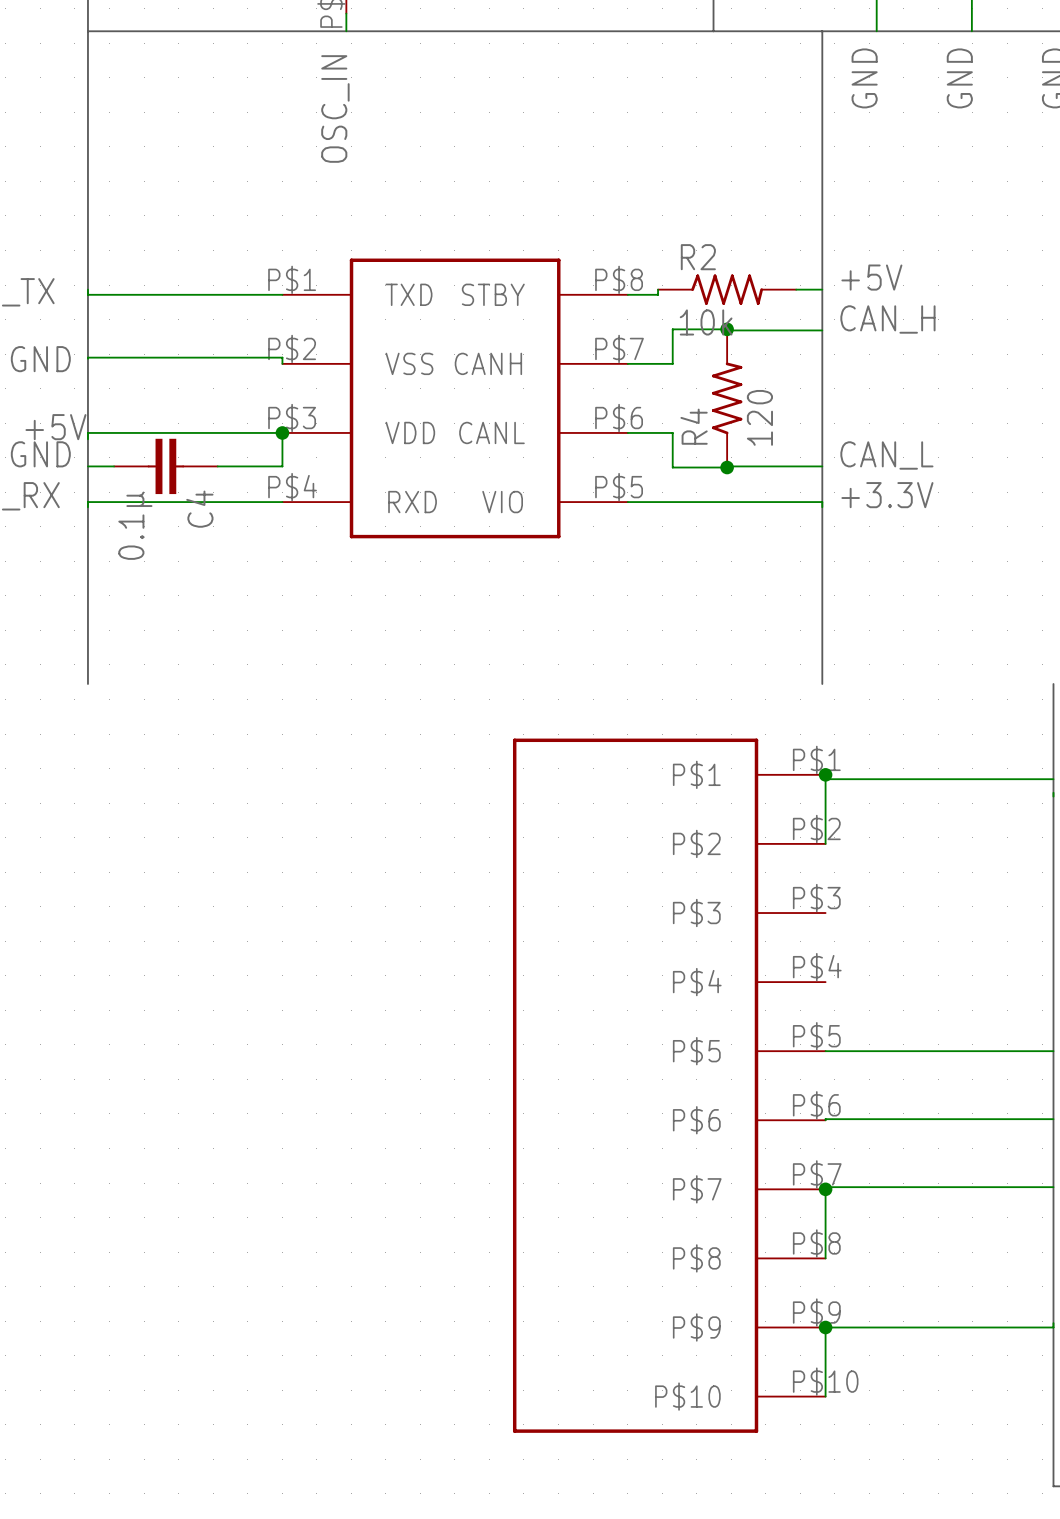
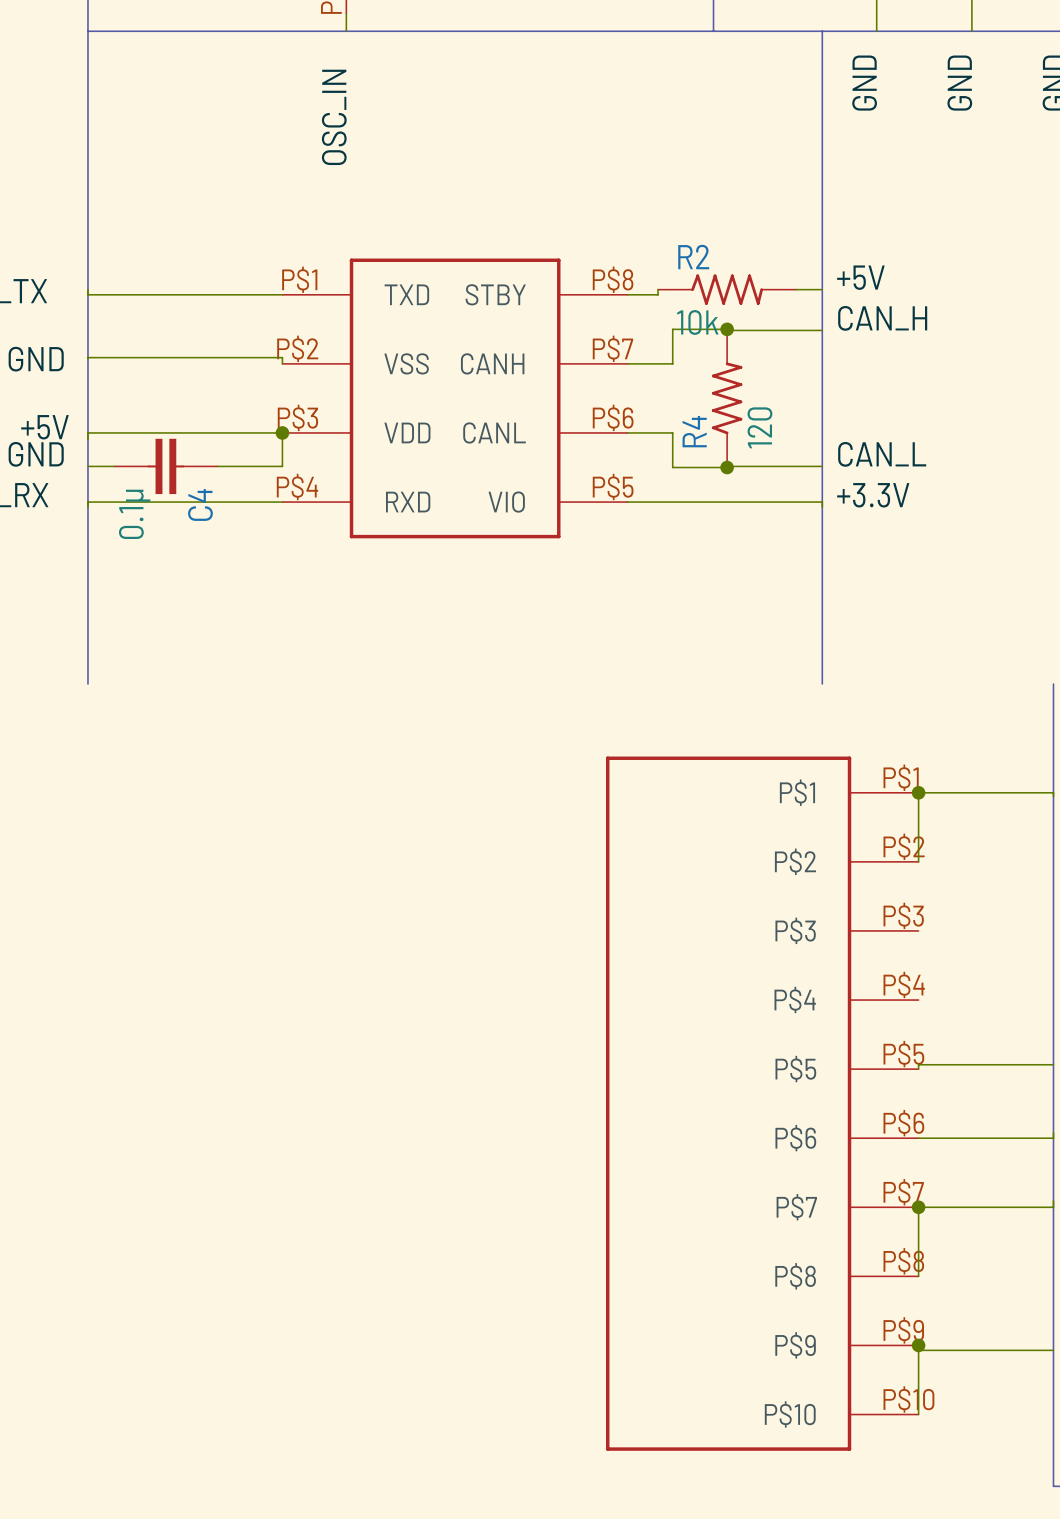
wire: (825, 774) (825, 843) -> none
junction: (825, 774) -> none
wire: (825, 779) (1053, 779) -> none
junction: none -> (918, 792)
wire: none -> (1053, 792) (918, 792) (918, 861)
wire: (825, 1051) (1053, 1051) -> none
wire: none -> (1053, 1064) (918, 1064) (918, 1069)
part position: (669, 1085) -> (762, 1103)
wire: (1053, 1119) (825, 1120) -> none
wire: none -> (1053, 1132) (1053, 1138) (918, 1138)
wire: (1053, 1187) (825, 1187) (825, 1258) -> none
junction: (825, 1189) -> none
wire: none -> (1053, 1200) (1053, 1207) (918, 1207) (918, 1276)
junction: none -> (918, 1207)
wire: (1053, 1323) (1053, 1327) (825, 1327) (825, 1396) -> none
junction: (825, 1327) -> none
wire: none -> (918, 1345) (918, 1414)
junction: none -> (918, 1345)
wire: none -> (918, 1350) (1053, 1350)

